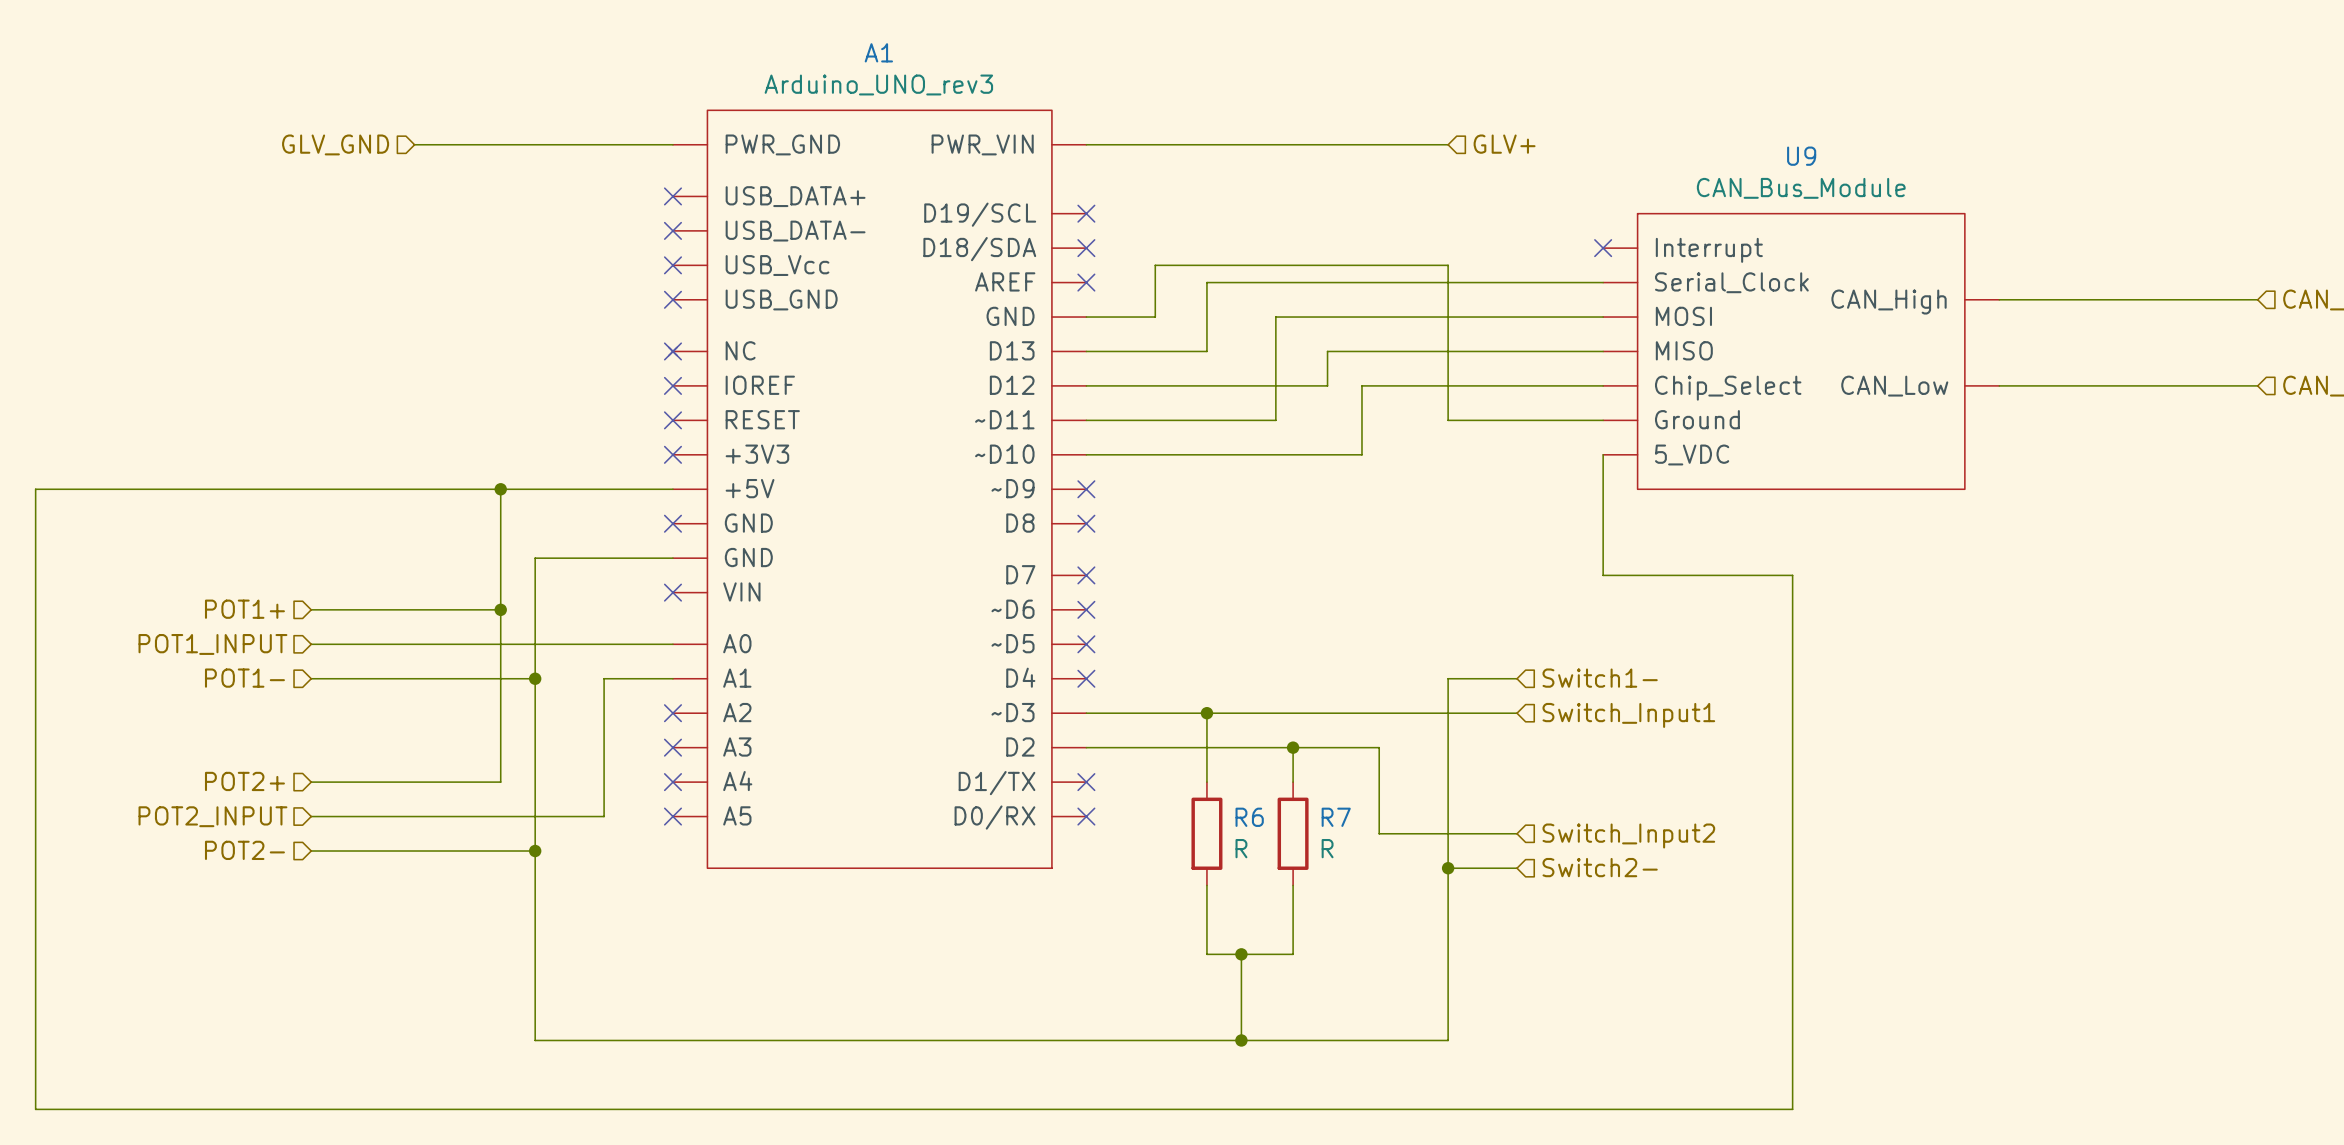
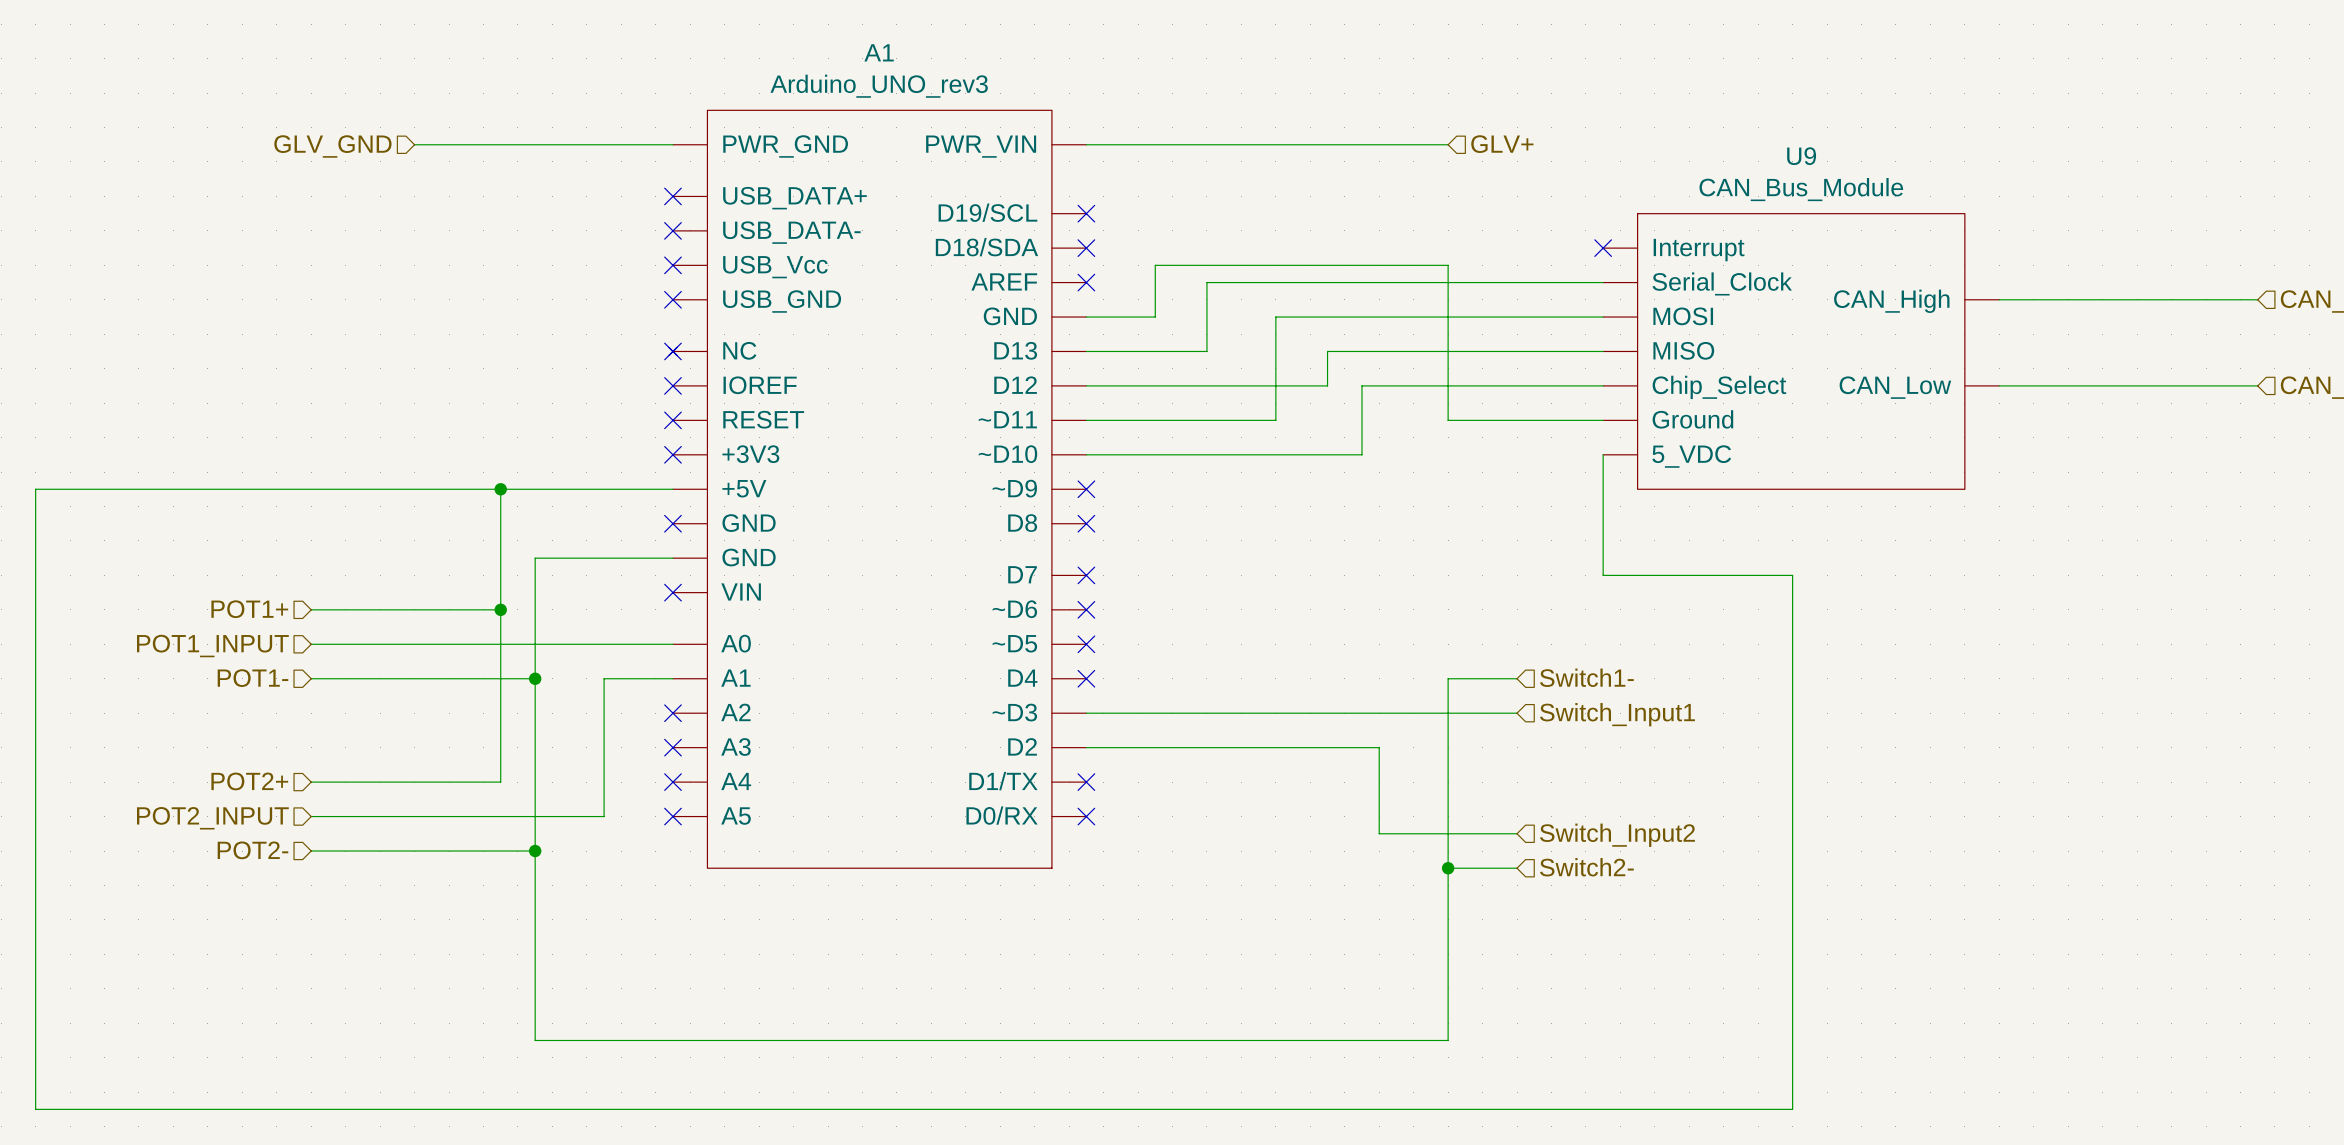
wire: (1206, 713) (1206, 782) -> none
junction: (1206, 713) -> none
wire: (1293, 747) (1293, 782) -> none
junction: (1293, 747) -> none
R6: R (1206, 833) -> none
R7: R (1293, 833) -> none
wire: (1206, 885) (1206, 954) (1293, 954) (1293, 885) -> none
wire: (1241, 954) (1241, 1040) -> none
junction: (1241, 954) -> none
junction: (1241, 1040) -> none

